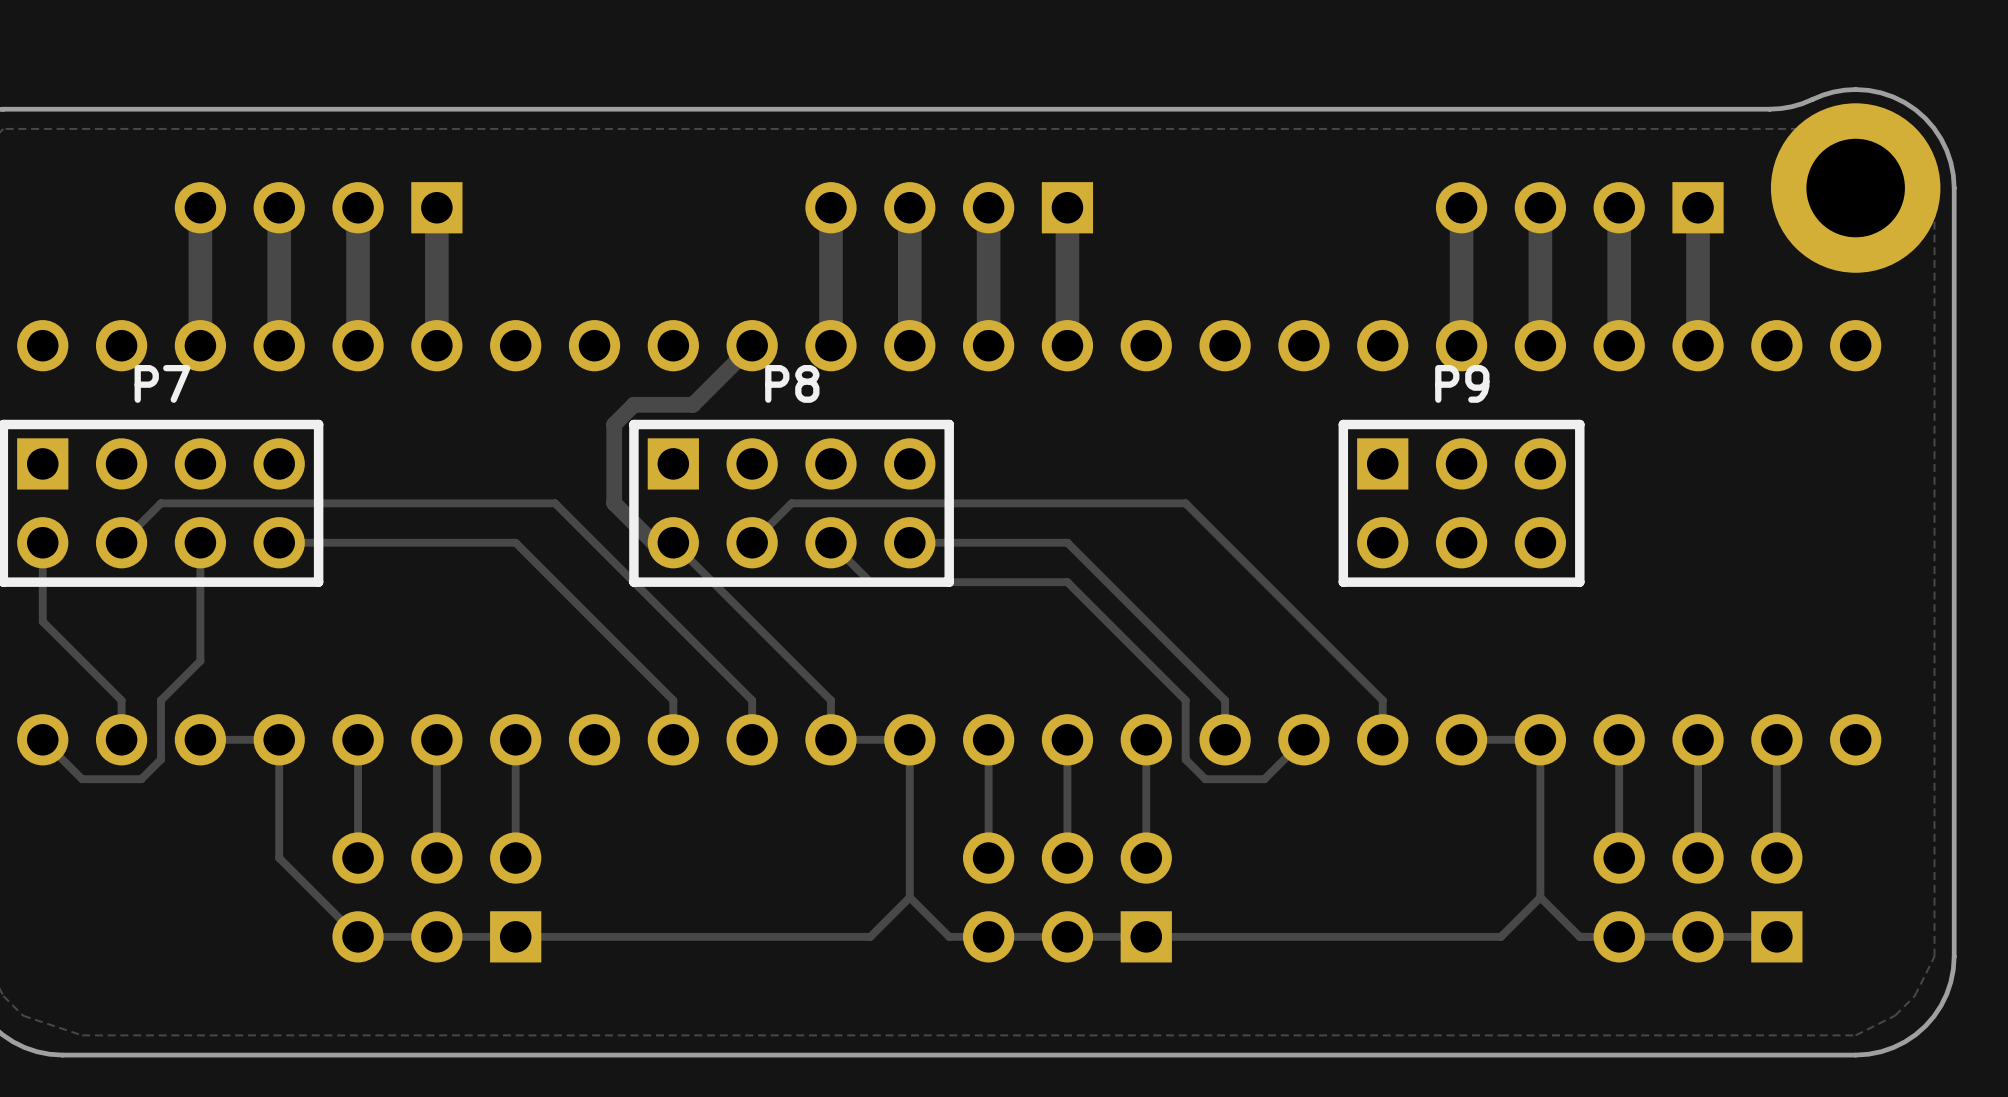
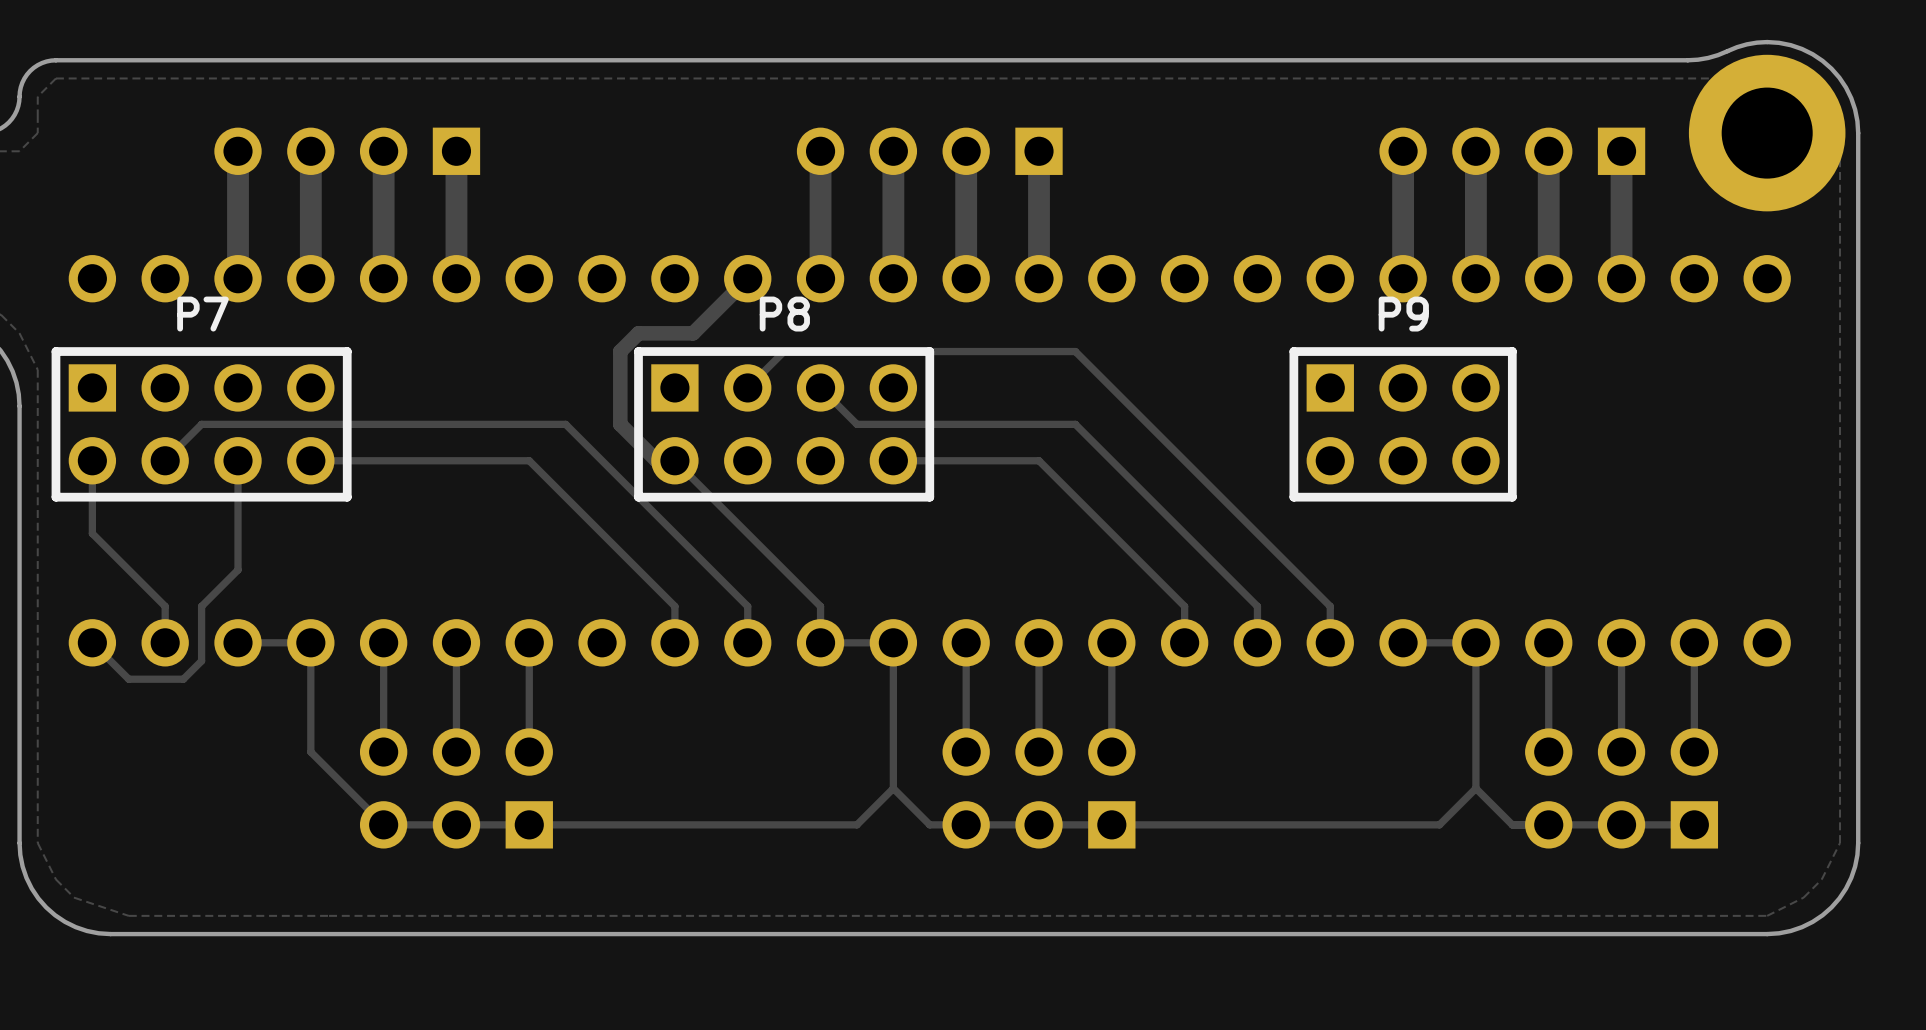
track: none -> (747, 387) (784, 351) (1075, 351) (1148, 424)
track: (870, 503) (791, 503) (752, 542) -> (856, 424) (820, 387)
track: (1185, 503) (1106, 503) -> (1257, 642) (1257, 606) (1075, 424)
track: (830, 542) (870, 582) (1067, 582) (1185, 700) (1185, 759) (1205, 779) (1264, 779) (1303, 739) -> none

